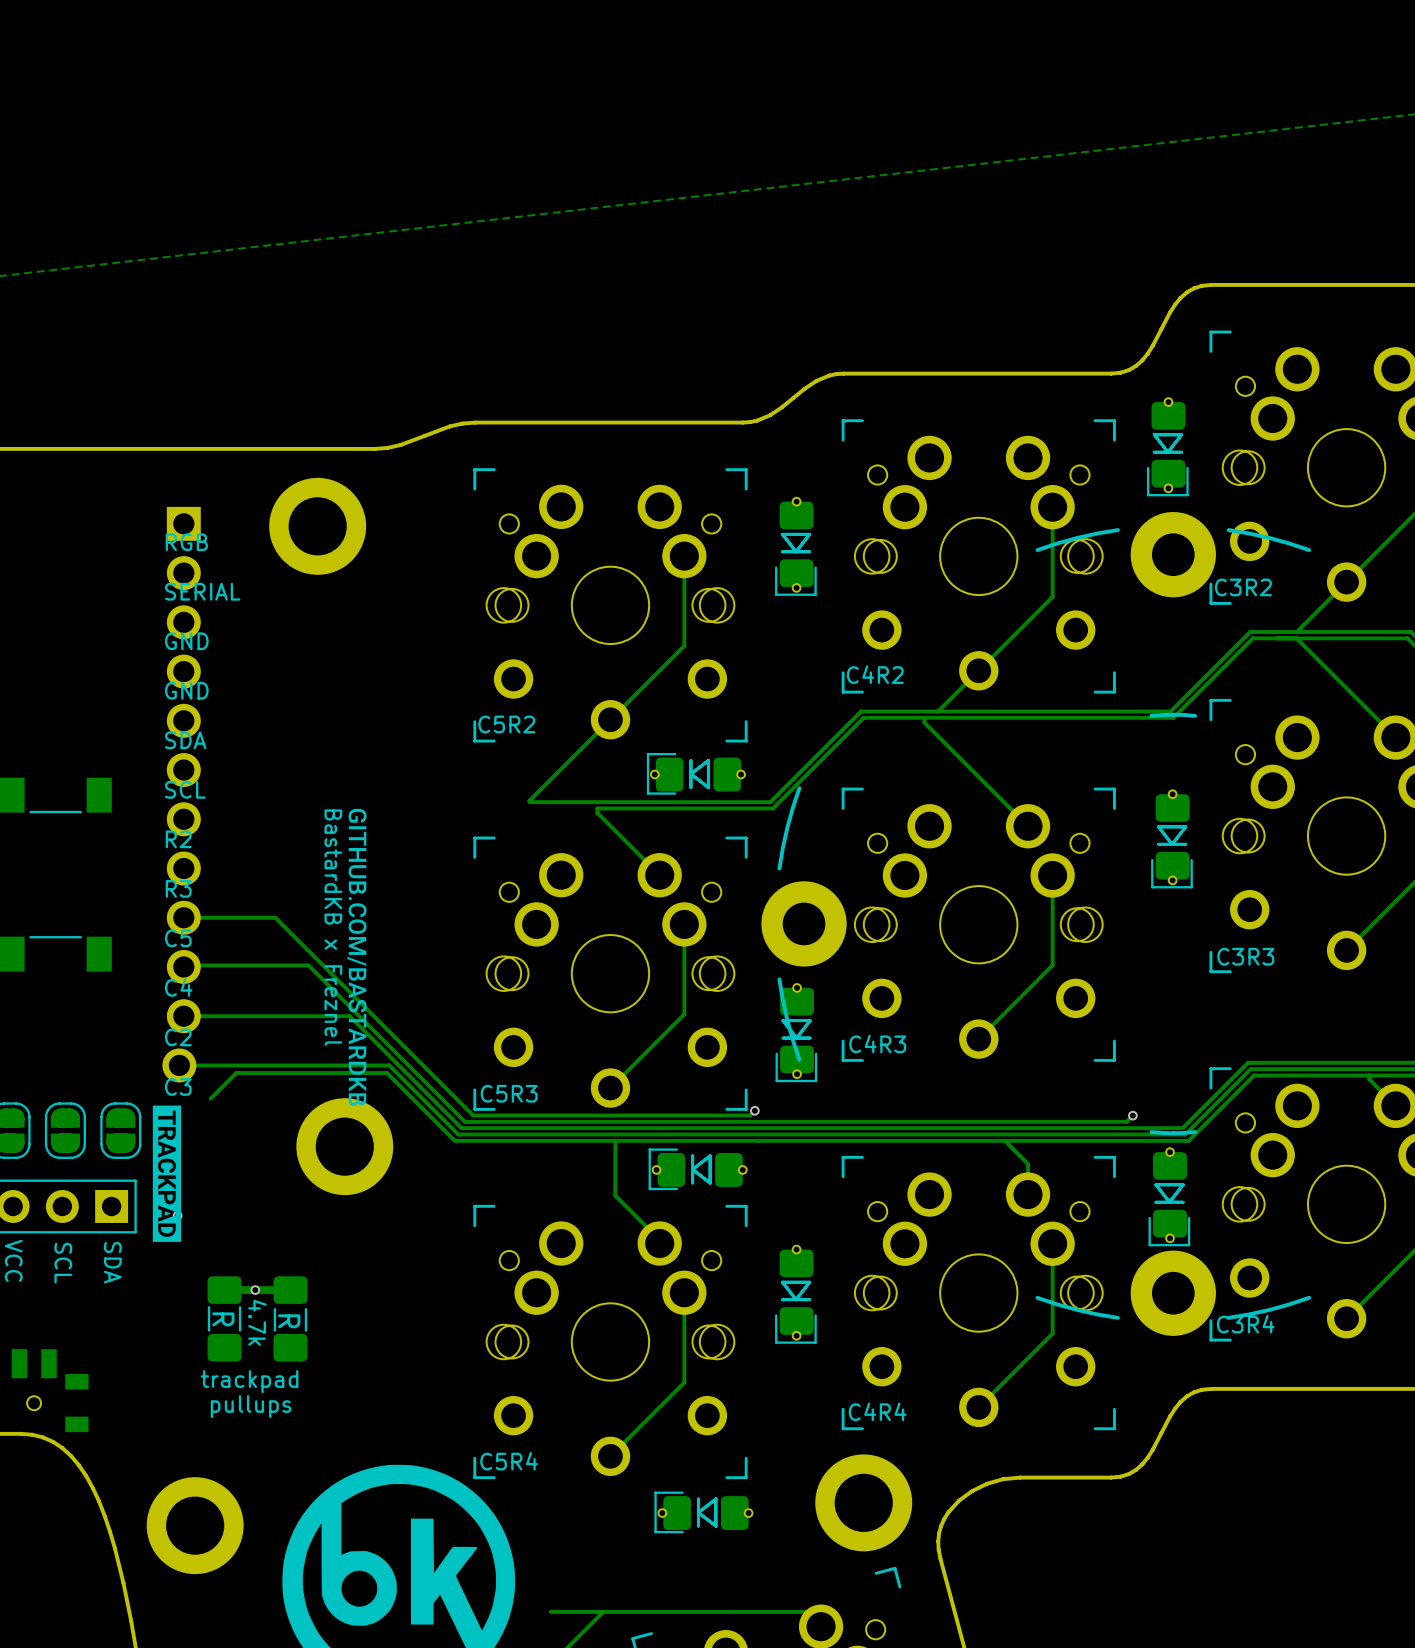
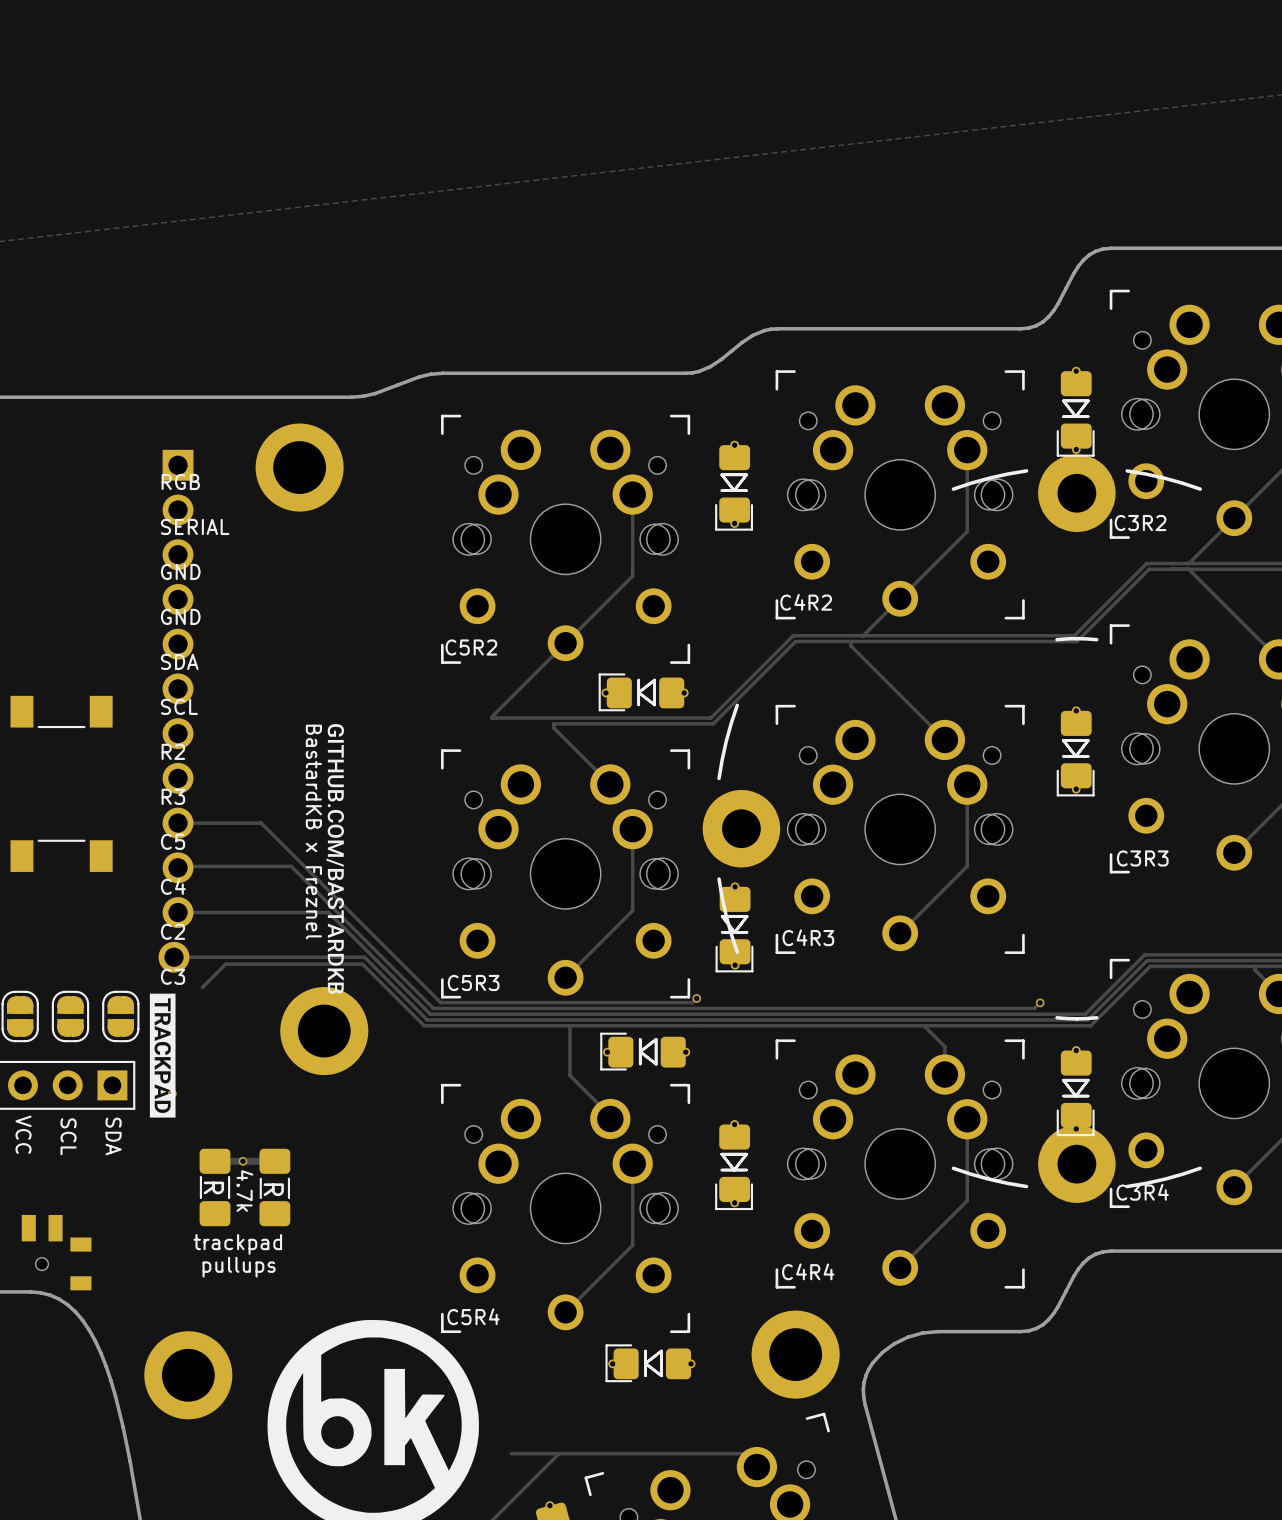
part position: (1167, 446) -> (1075, 411)
part position: (1169, 1196) -> (1075, 1091)

